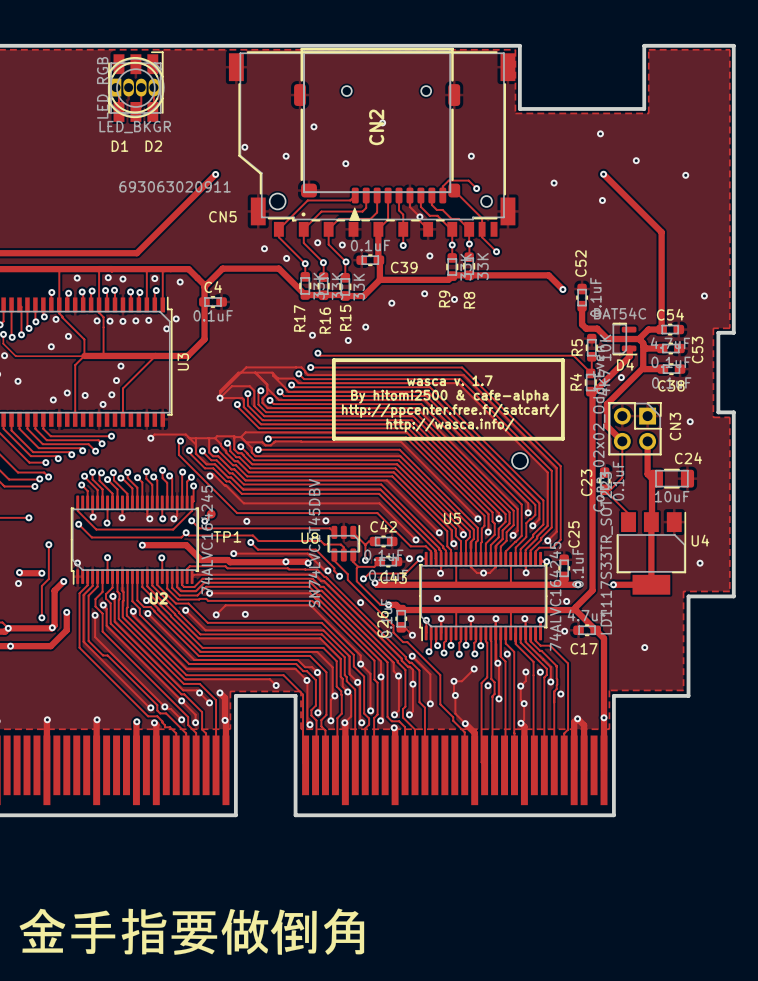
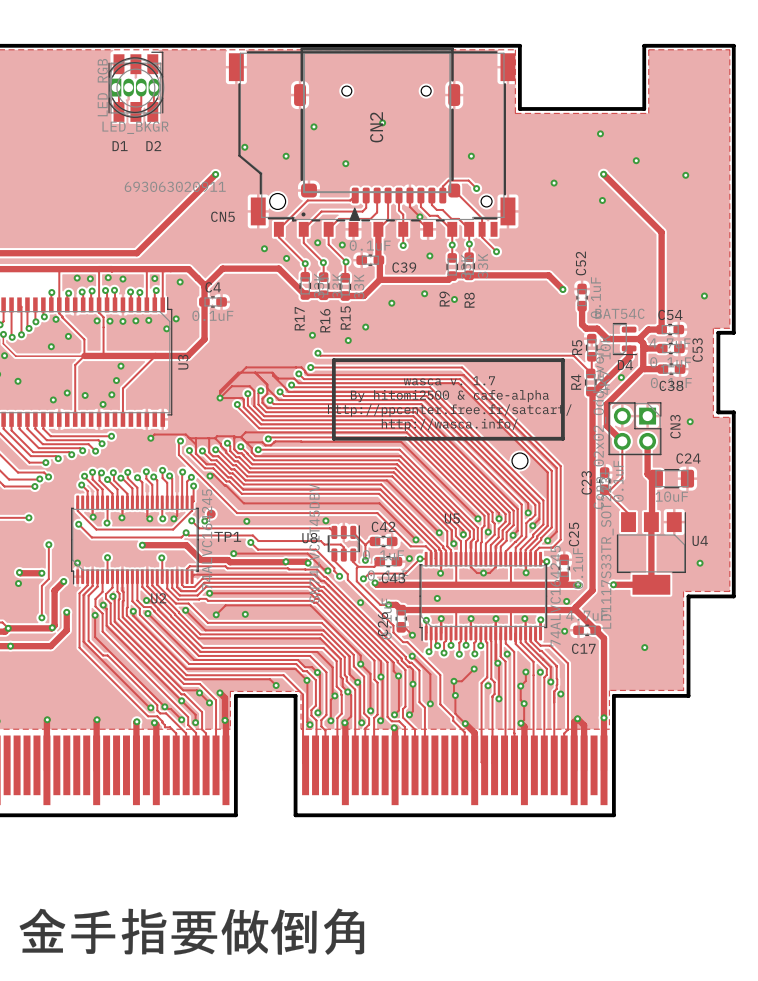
via: none -> (90, 278)

